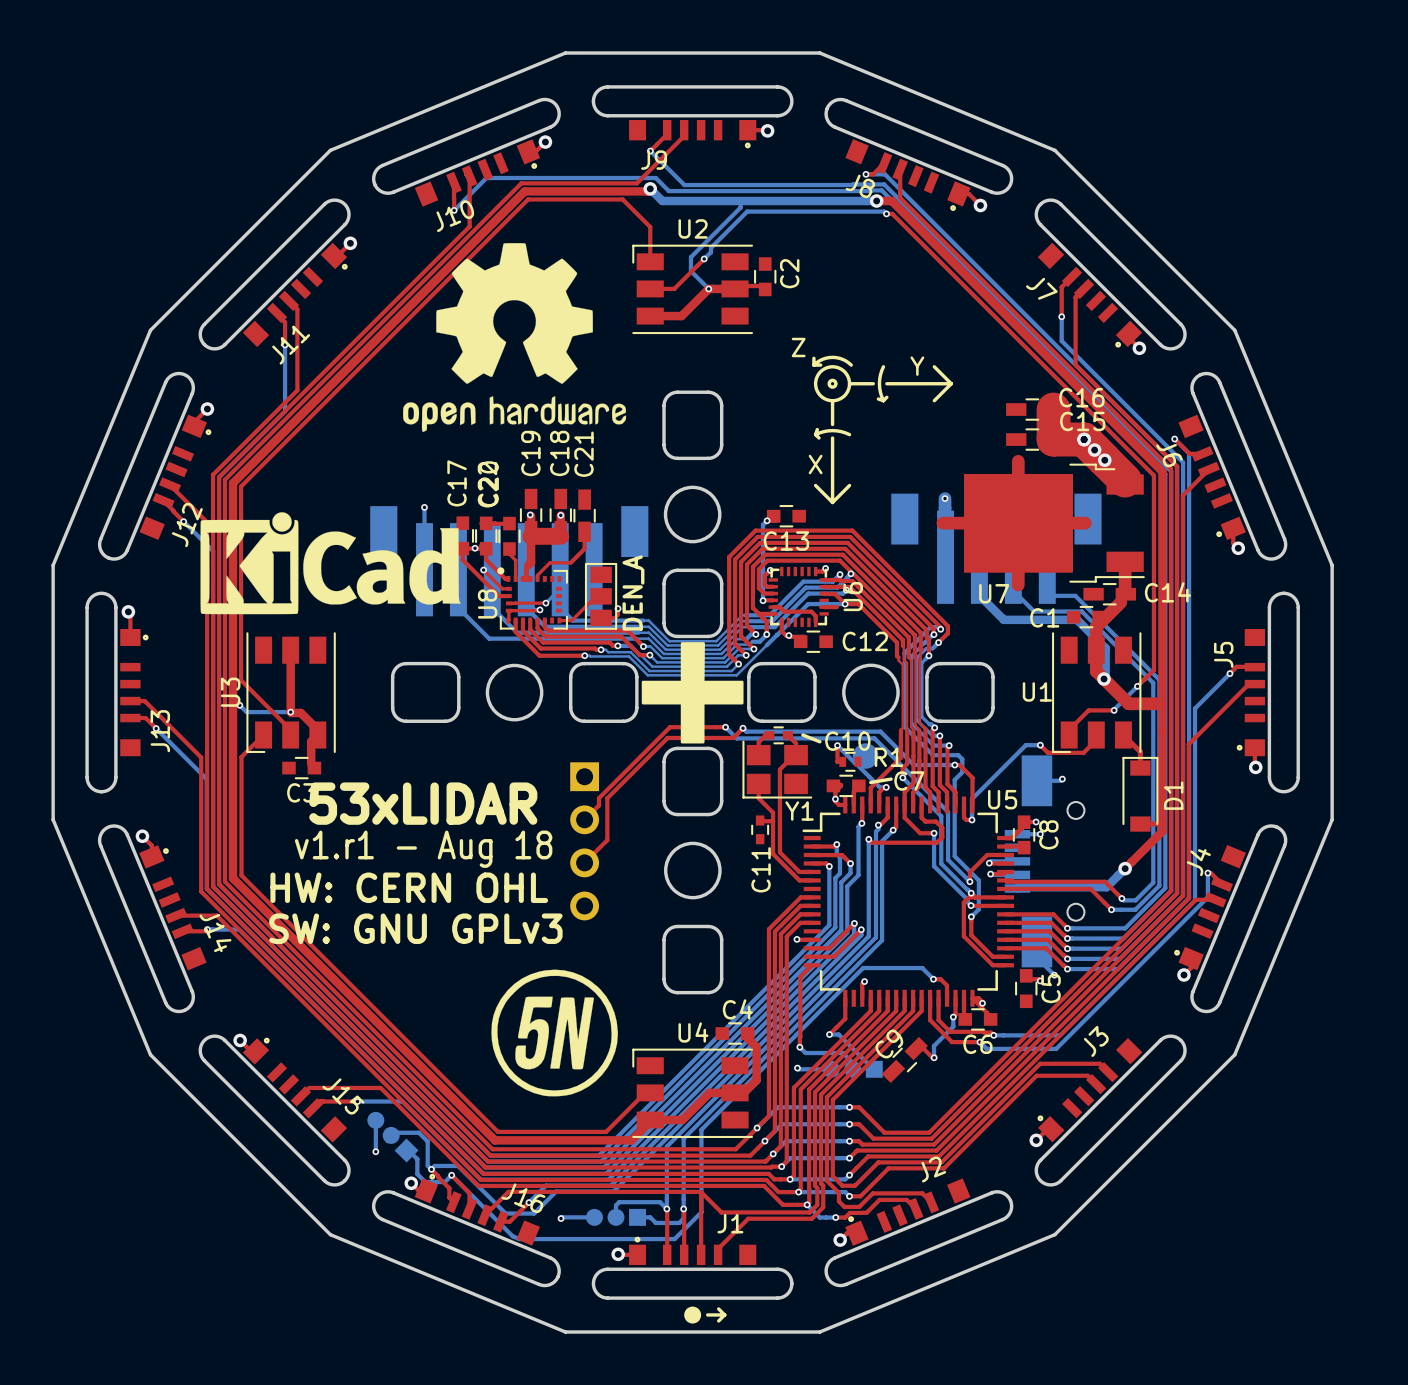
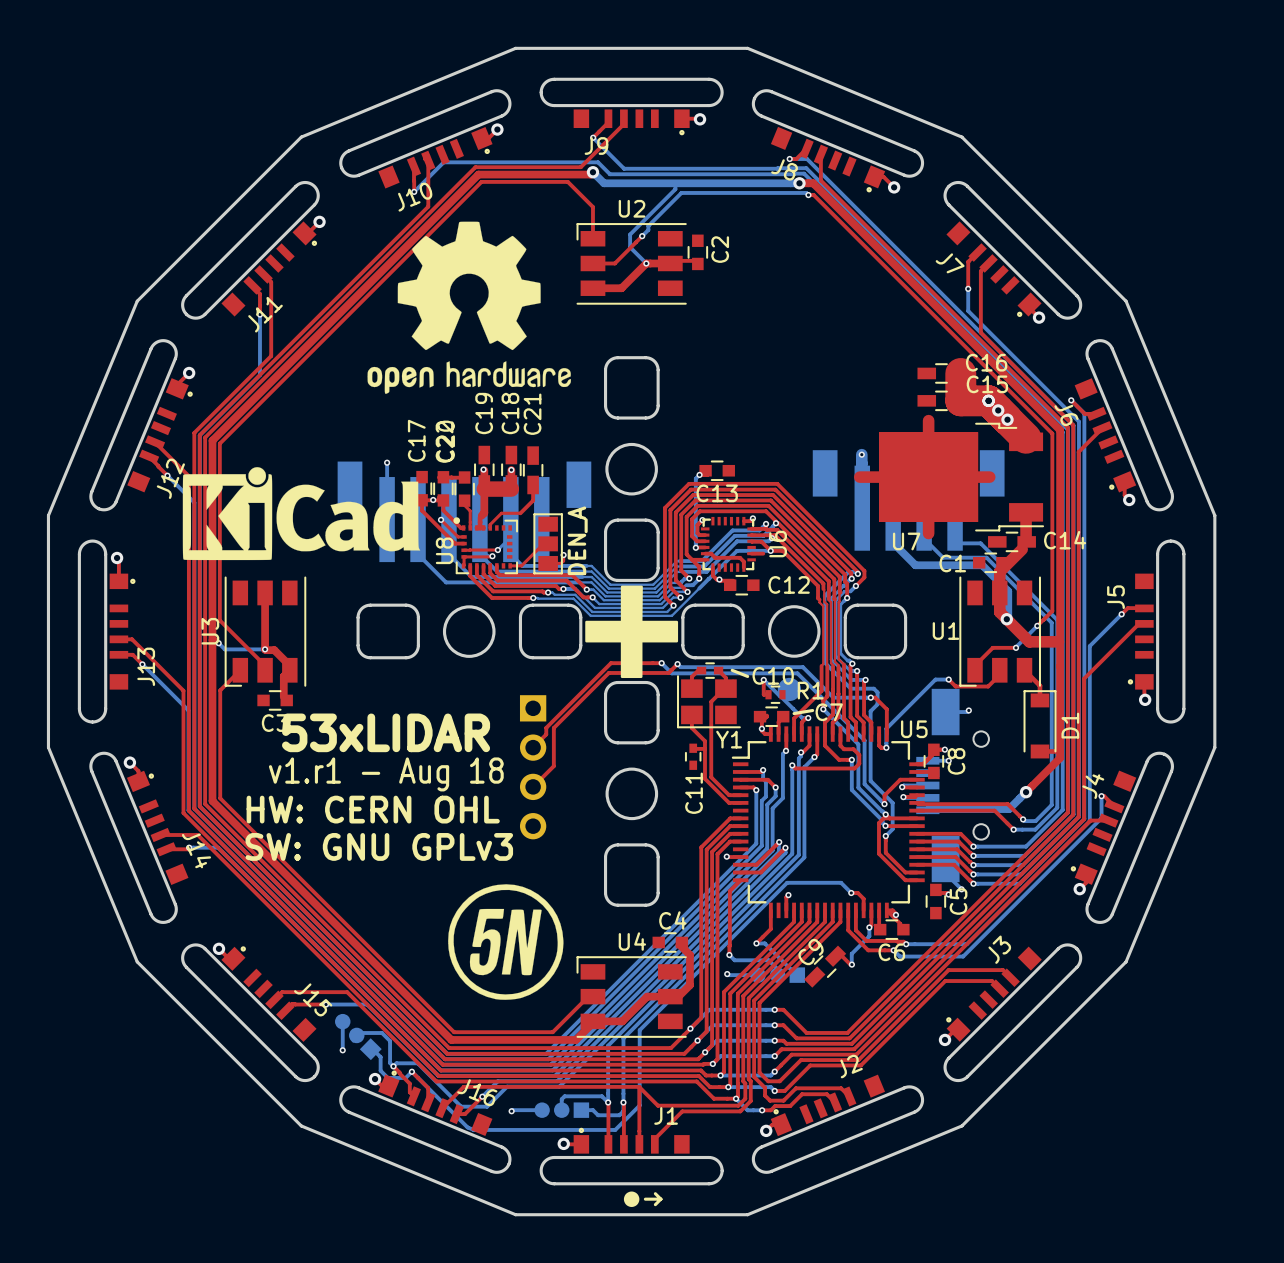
drawing: [812, 355, 953, 505] -> none

